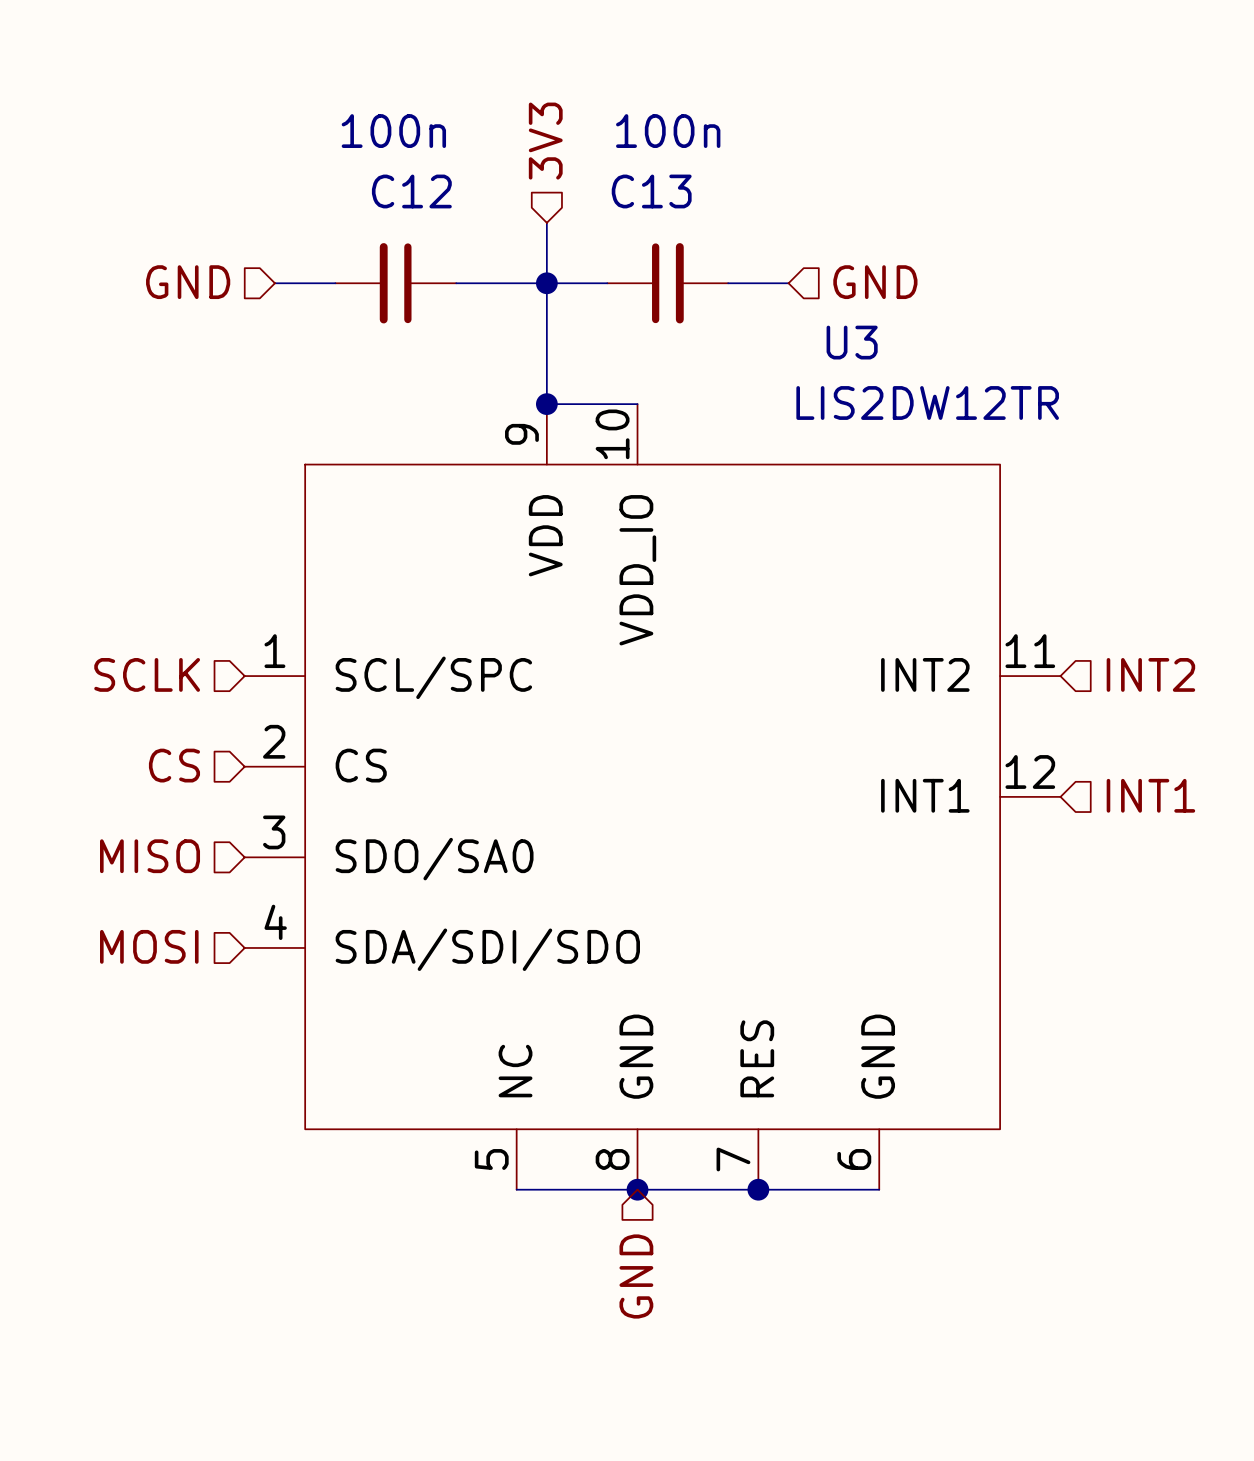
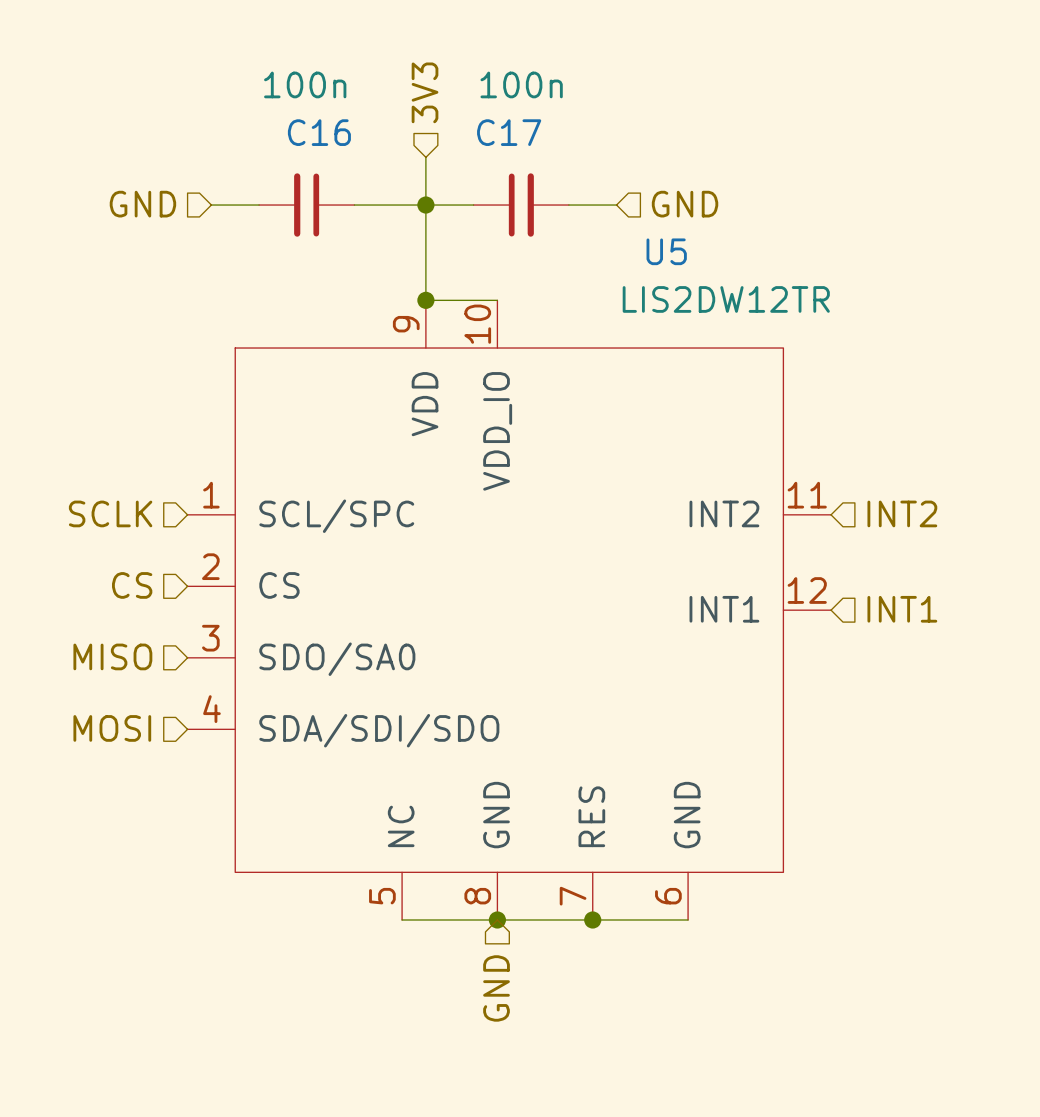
C12 name: C12 (411, 191) -> C16 (319, 132)
C13 name: C13 (651, 191) -> C17 (509, 132)
U3 name: U3 (852, 342) -> U5 (666, 251)

